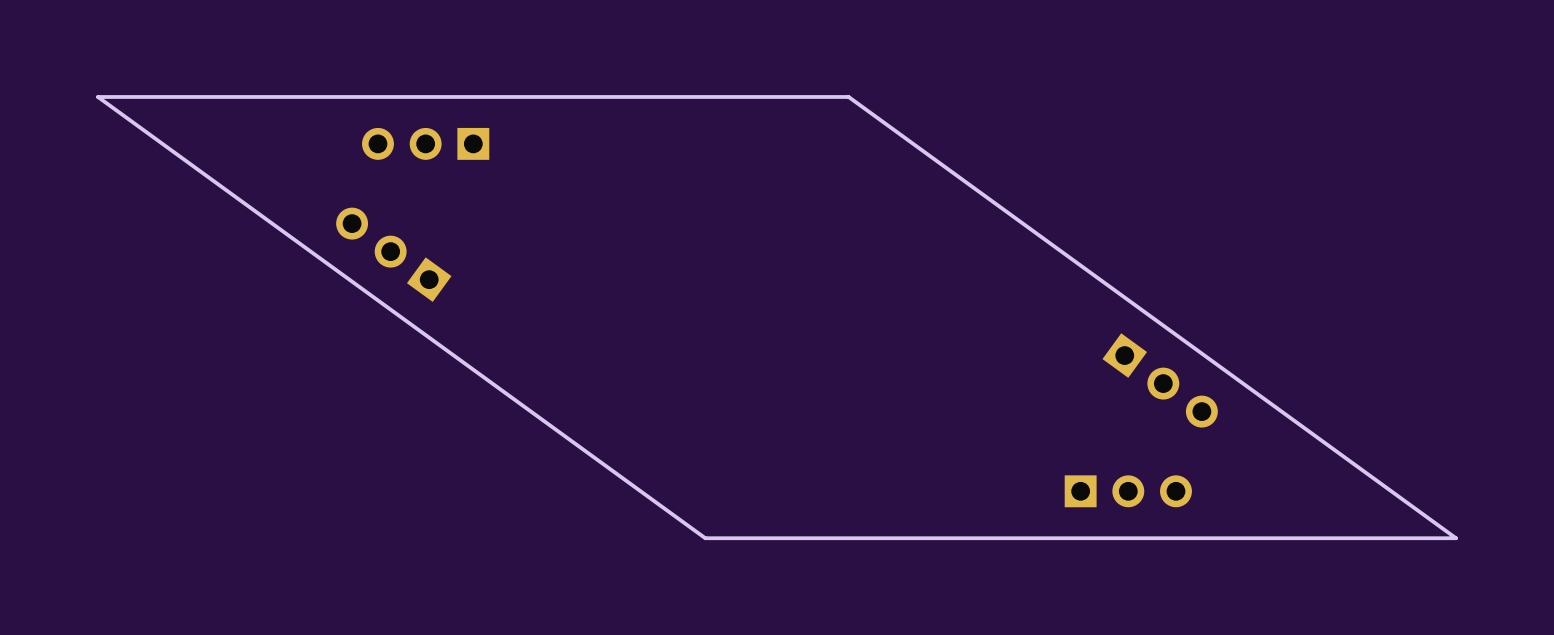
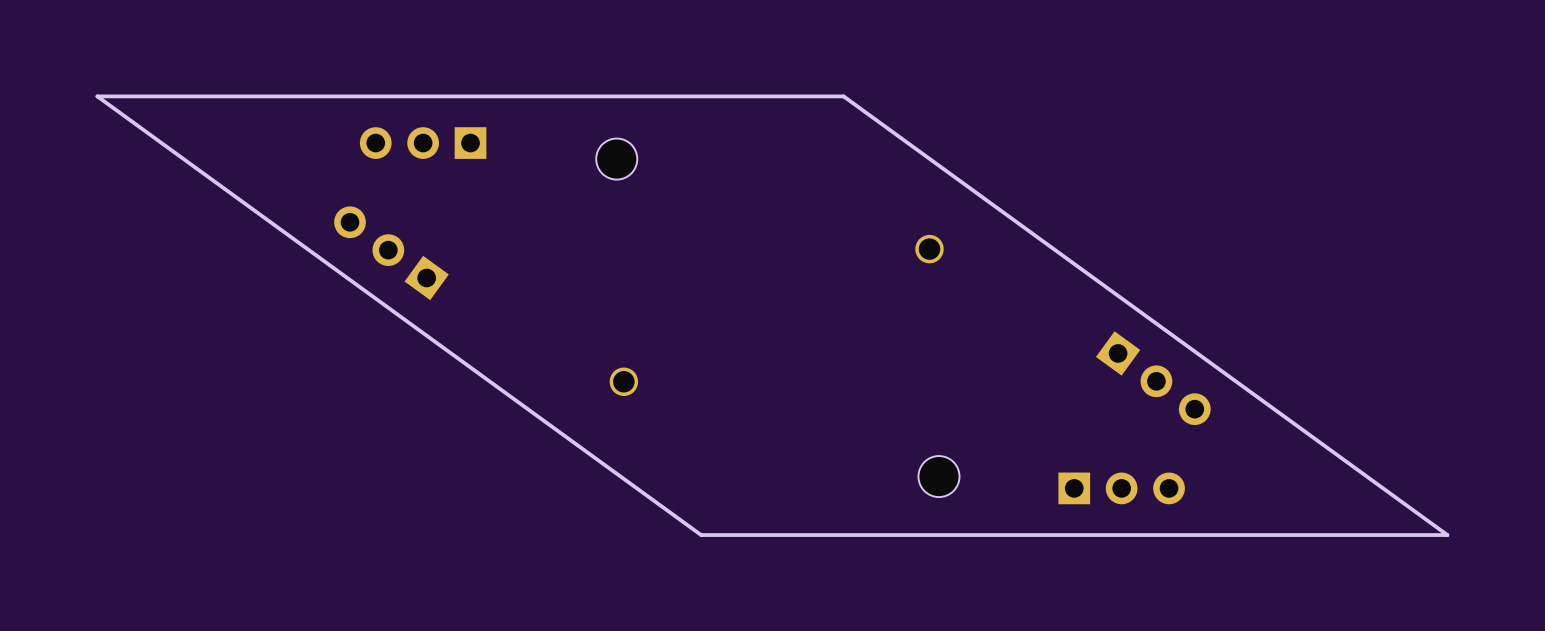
part: none -> (616, 159)
part: none -> (929, 249)
part: none -> (623, 381)
part: none -> (938, 476)

